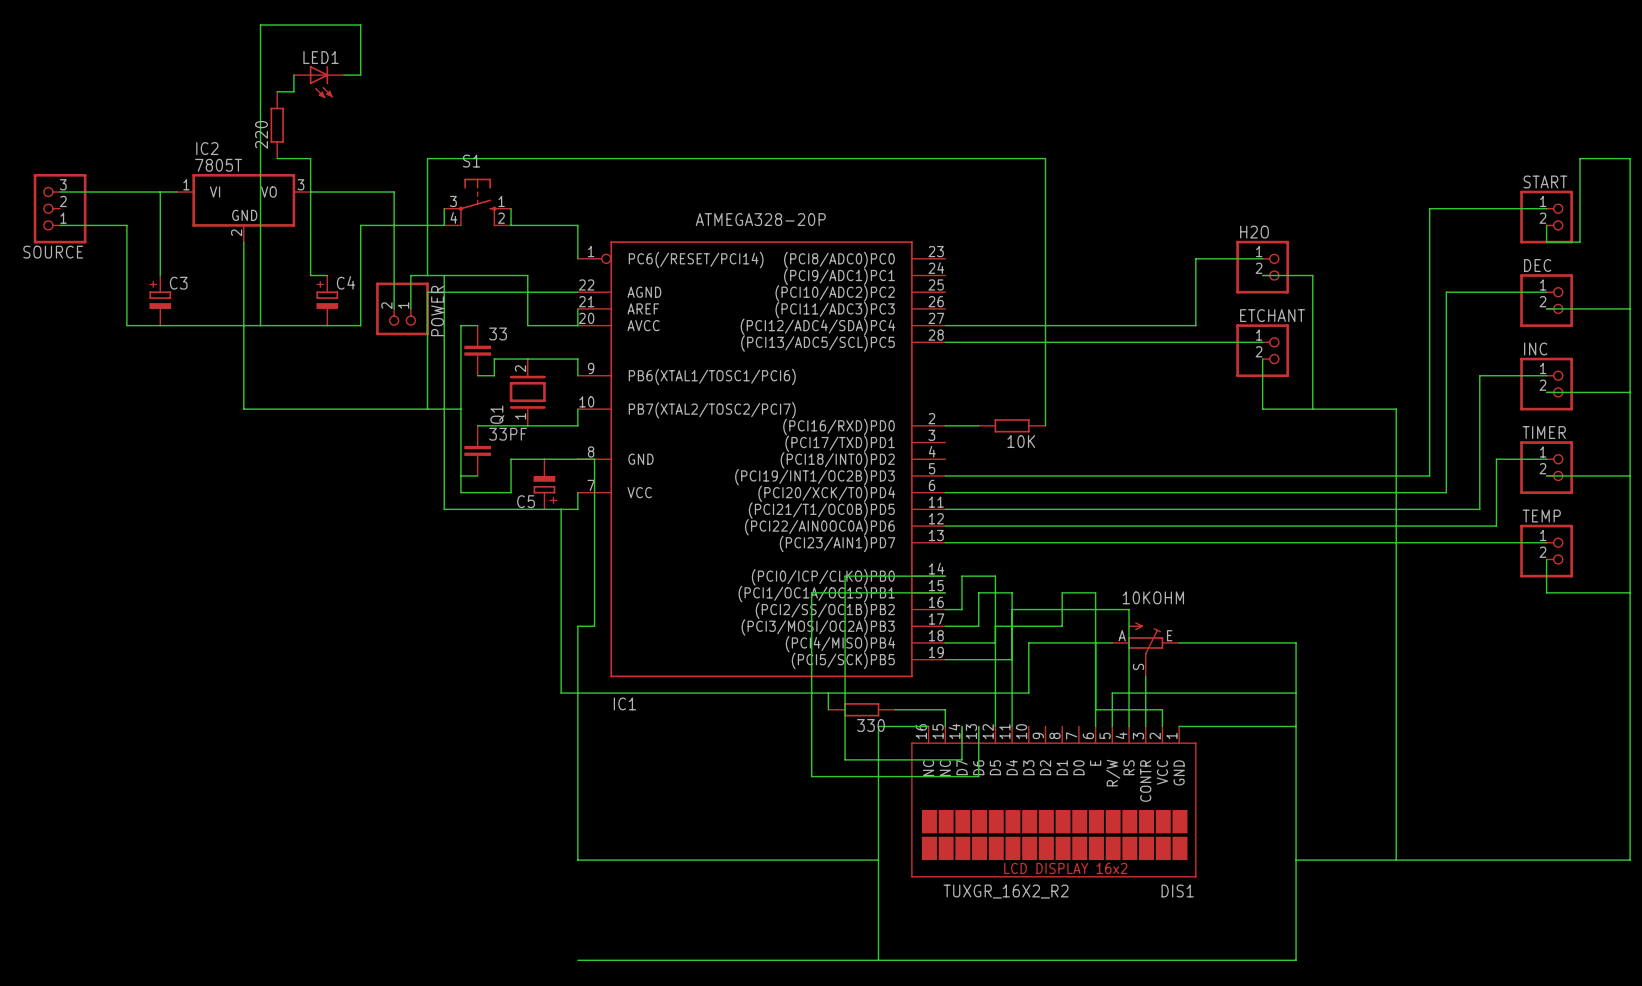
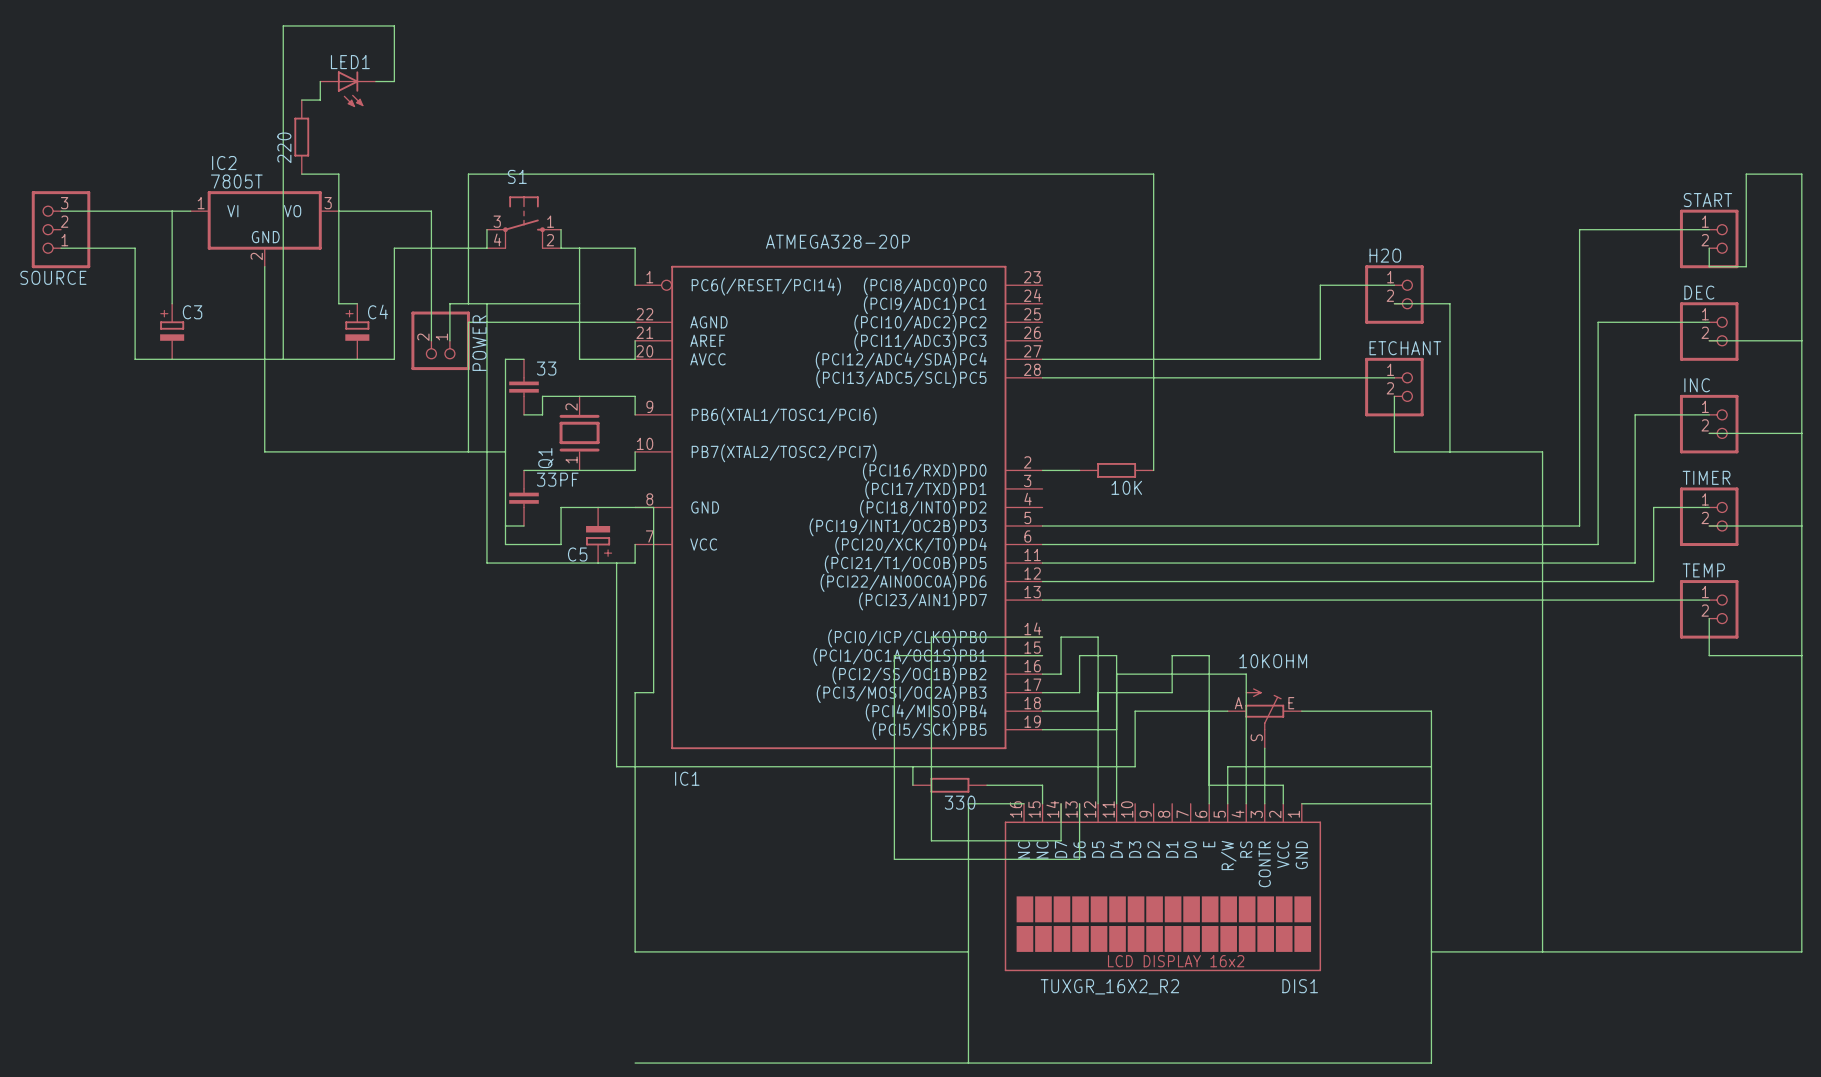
wire: none -> (579, 248) (579, 303)

